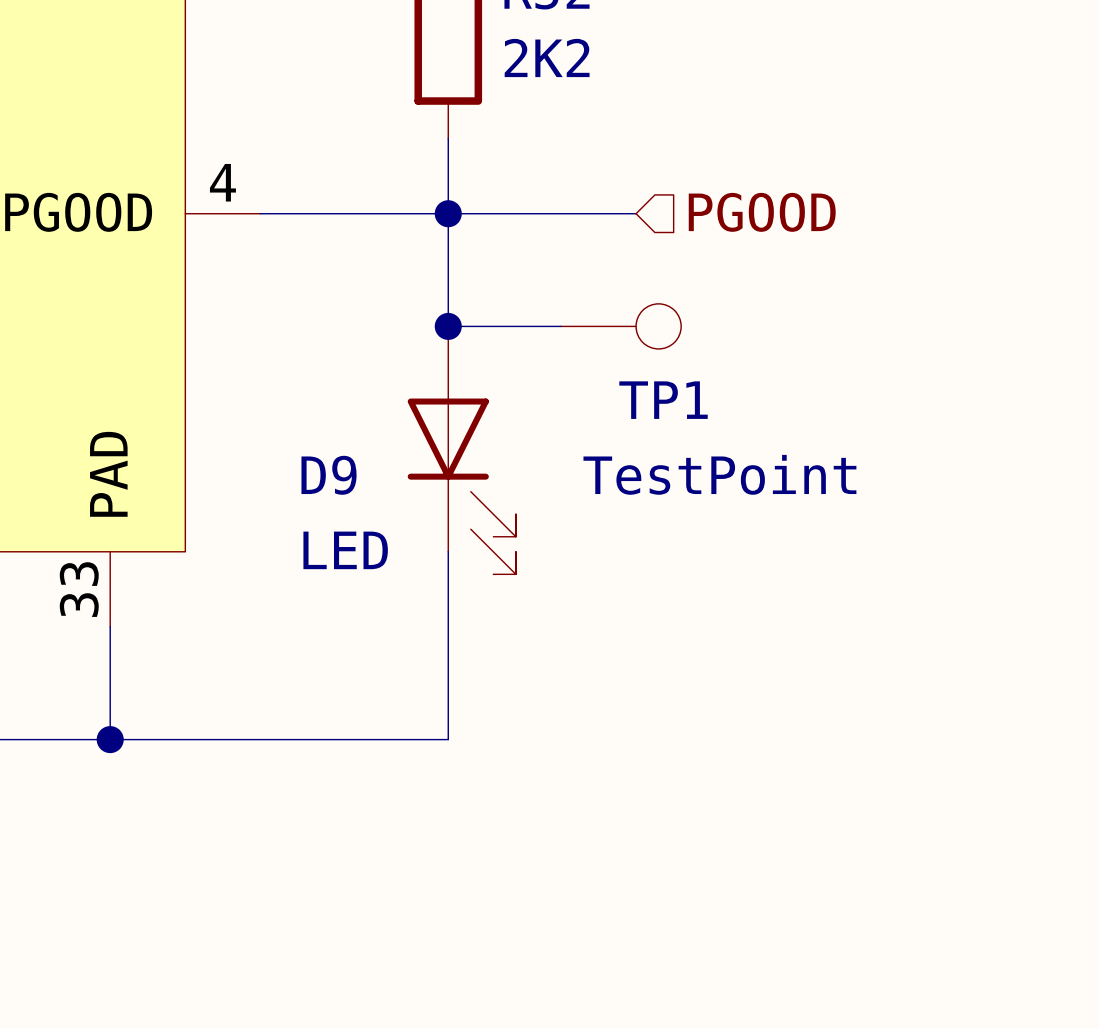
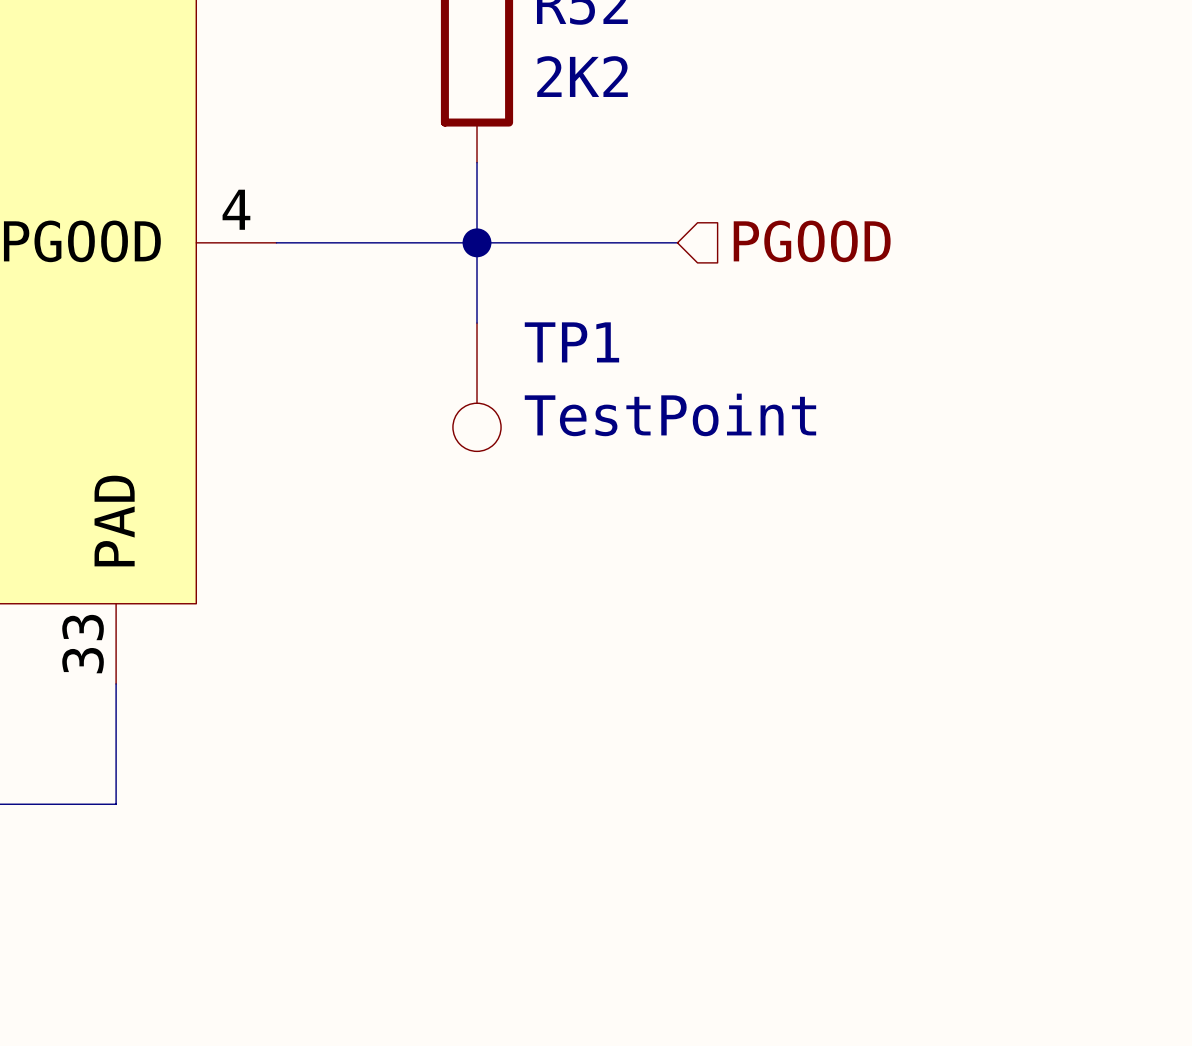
wire: (448, 288) (448, 326) (560, 326) -> none
junction: (448, 326) -> none
TP1 position: (621, 326) -> (477, 387)
TP1 rotation: 0° (658, 326) -> 90° clockwise (477, 427)
TP1 name position: TP1 (663, 400) -> TP1 (571, 342)
D9: LED (461, 450) -> none
TP1 value position: TestPoint (719, 474) -> TestPoint (670, 414)
wire: (448, 551) (448, 739) (110, 739) -> none
junction: (110, 739) -> none

